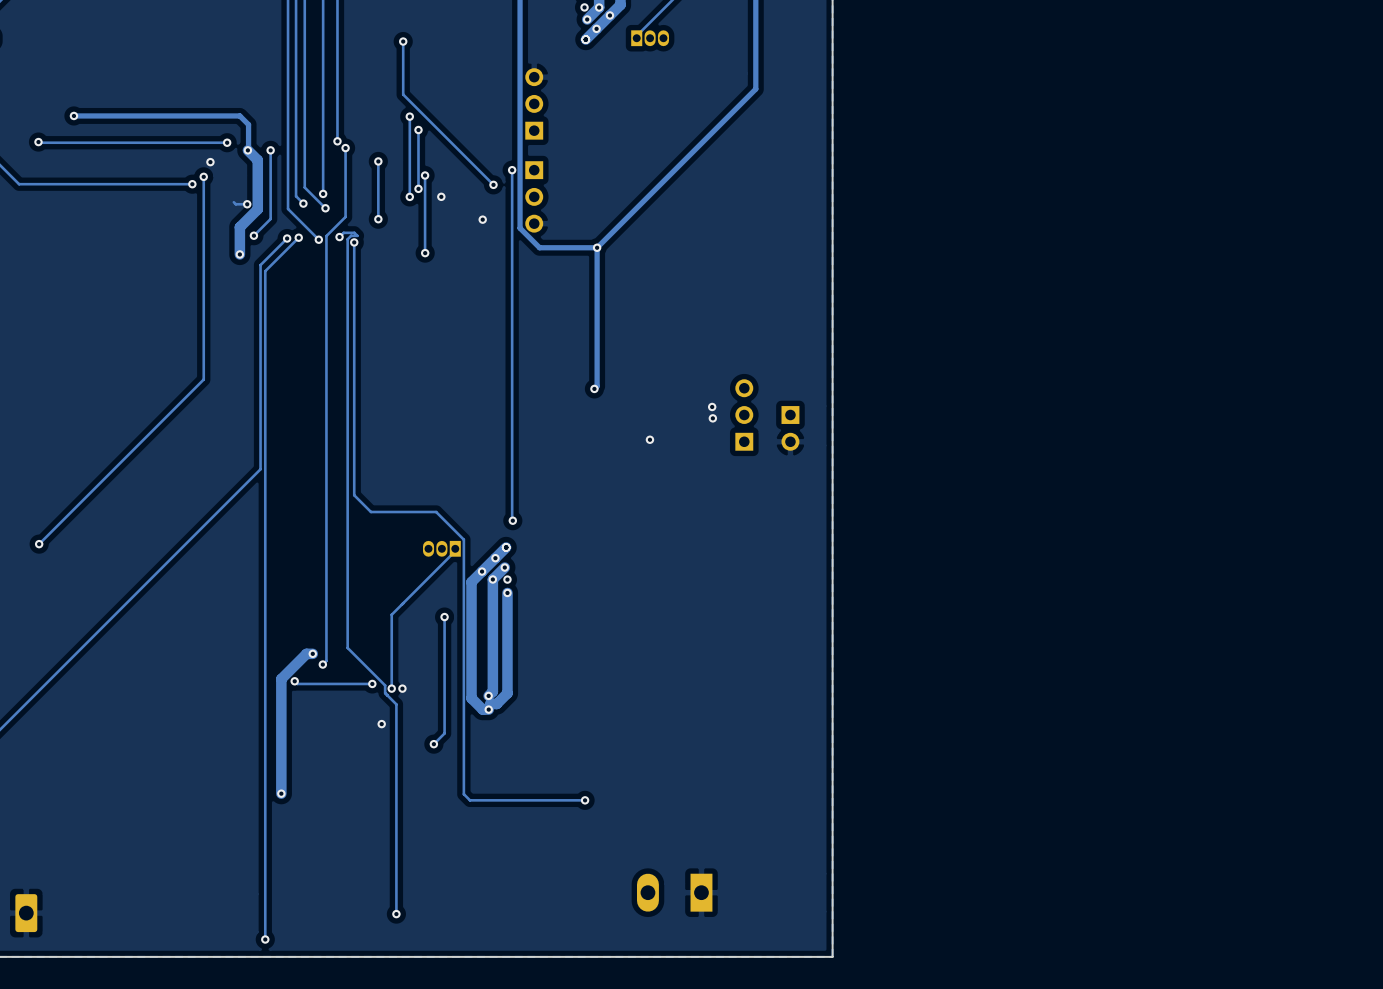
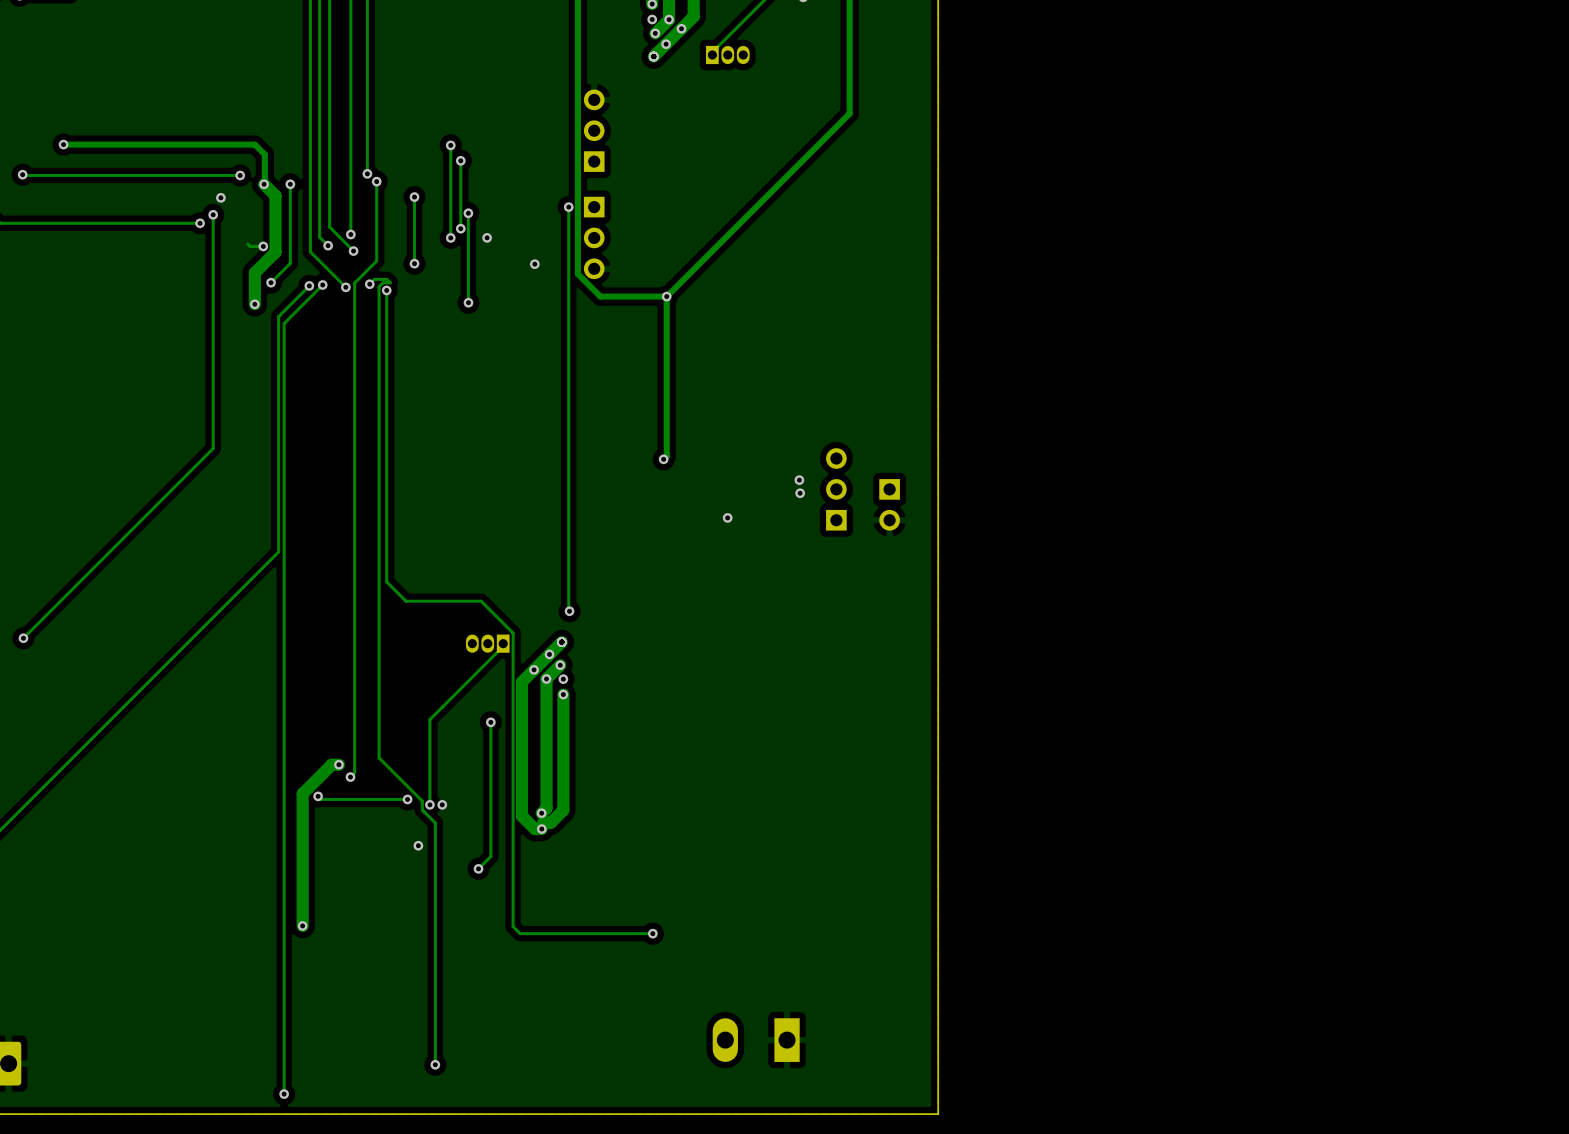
track: (403, 41) (403, 94) (493, 184) -> none
via: (403, 41) -> none
via: (493, 184) -> none

